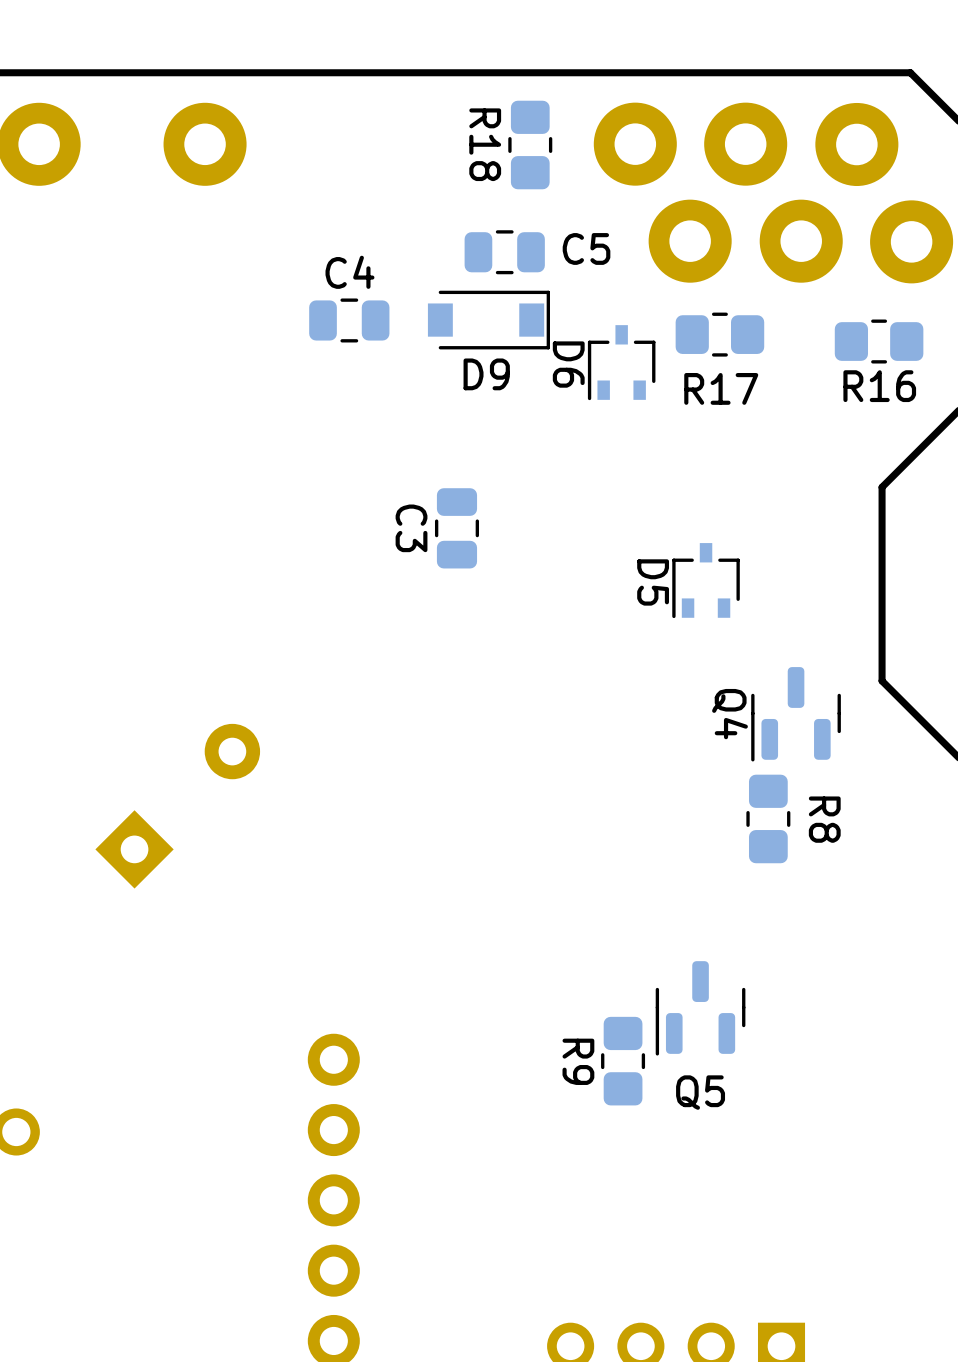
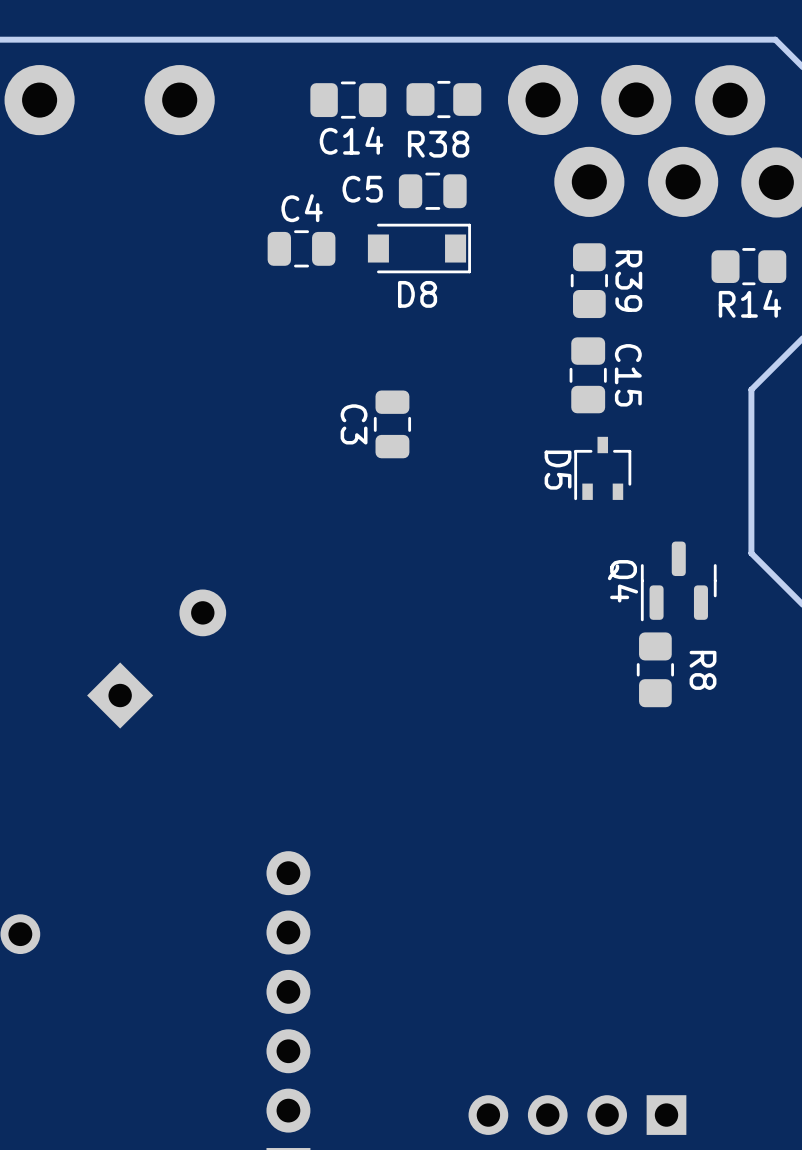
R38: none -> (443, 99)
C14: none -> (348, 100)
R18: (530, 145) -> none
C5 name position: C5 (586, 248) -> C5 (362, 189)
R17: (719, 334) -> none
R39: none -> (589, 280)
D6: (621, 362) -> none
D9 name: D9 (486, 374) -> D8 (417, 294)
R16 name: R16 (879, 386) -> R14 (749, 303)
C15: none -> (588, 375)
Q5: (700, 1008) -> none
R9: (623, 1061) -> none

